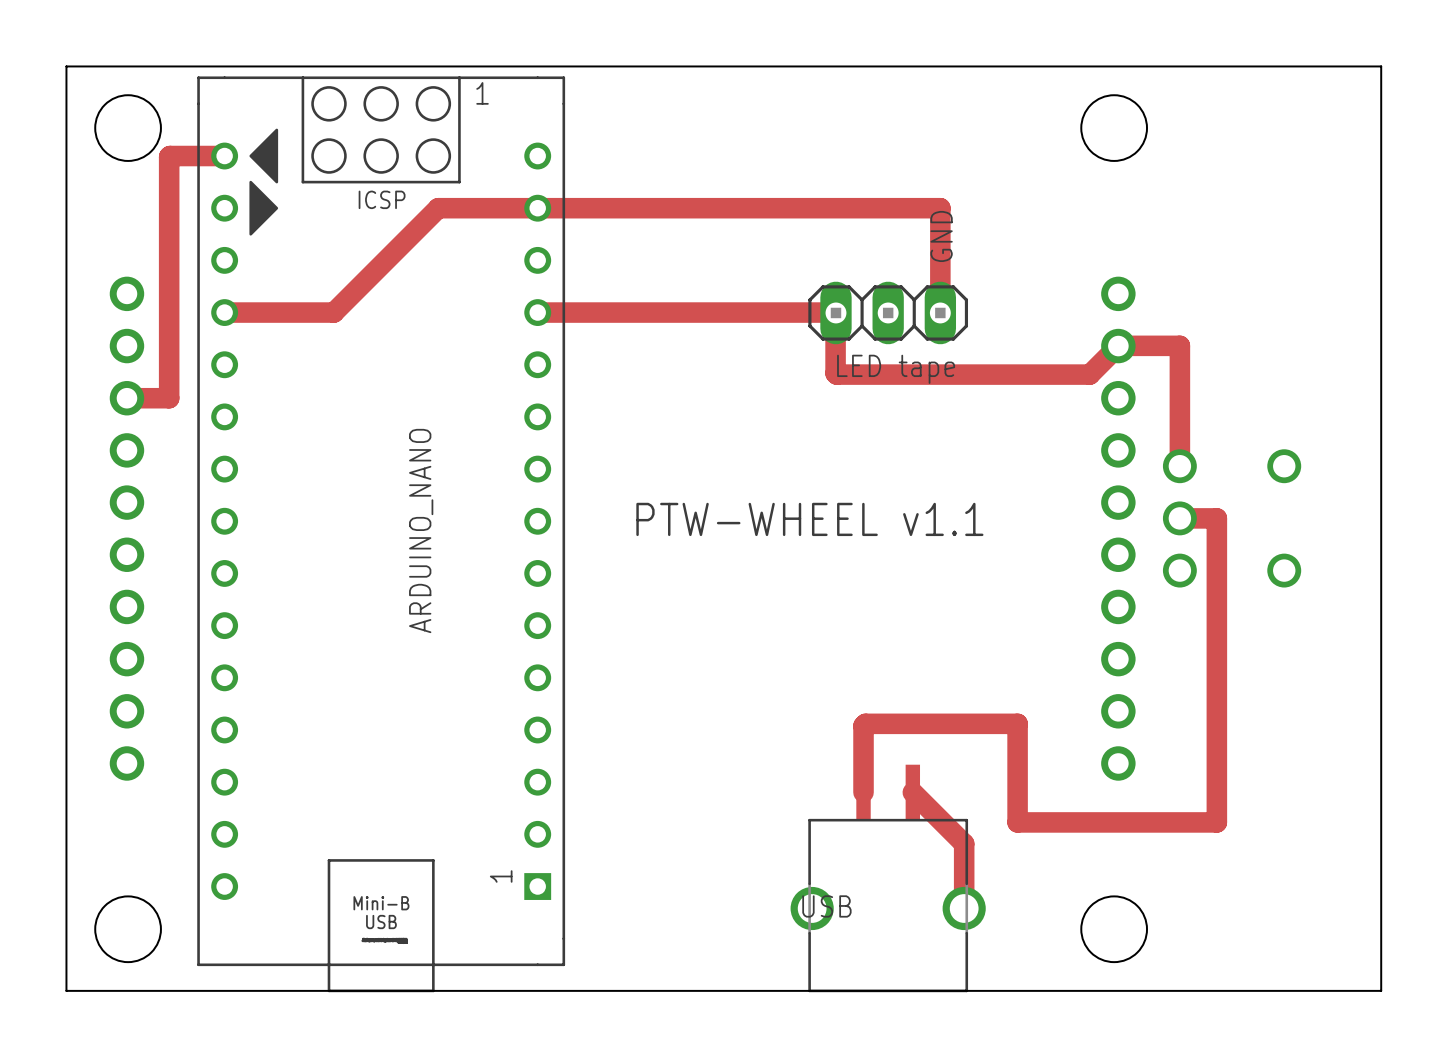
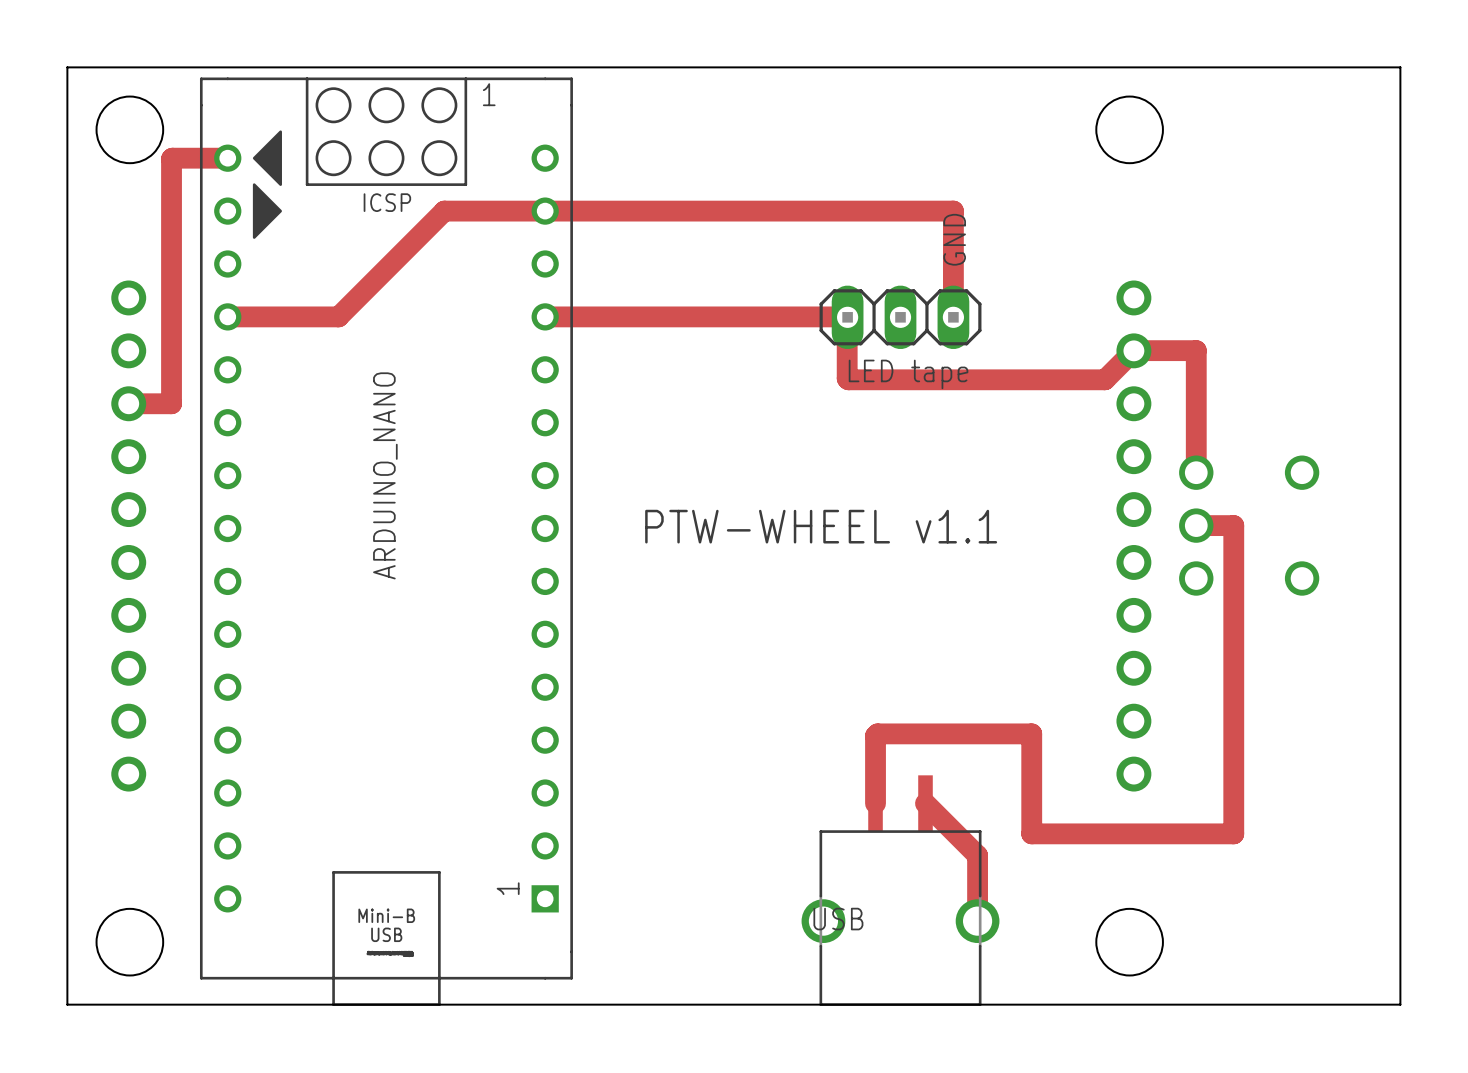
ARDUINO_NANO name position: ARDUINO_NANO (421, 530) -> ARDUINO_NANO (385, 475)

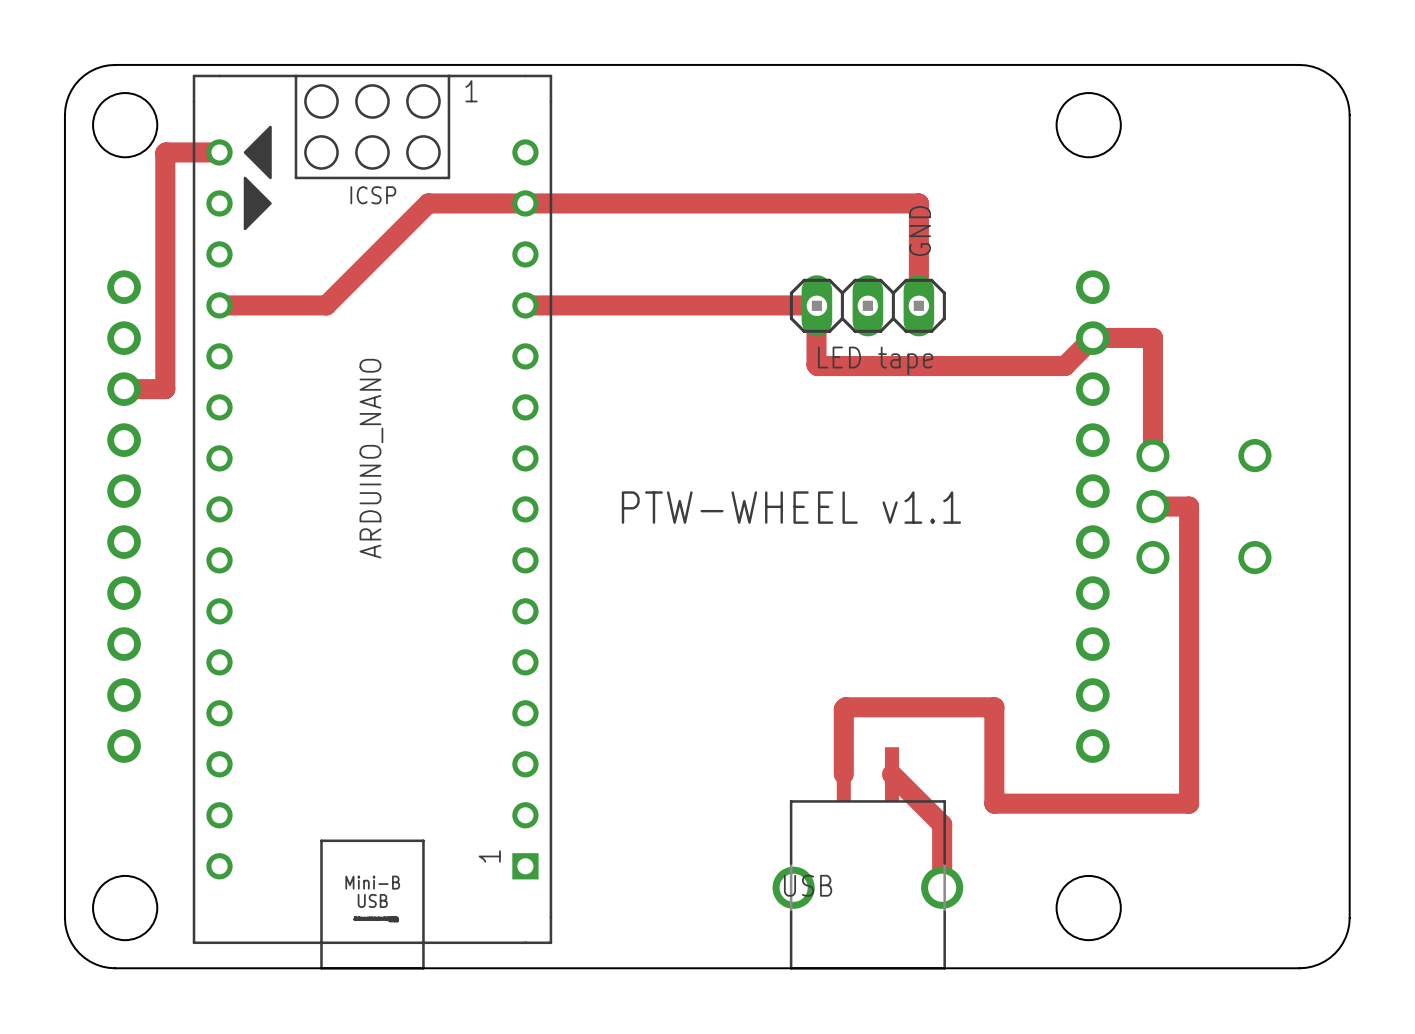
board edge: (119, 67) (67, 67) (67, 119) -> (115, 64) (95, 68) (79, 79) (68, 95) (64, 115)
board edge: (1348, 67) (1400, 67) (1400, 119) -> (1299, 64) (1318, 68) (1334, 79) (1345, 95) (1349, 115)
board edge: (67, 952) (67, 1004) (119, 1004) -> (64, 918) (68, 937) (79, 953) (95, 964) (115, 968)
board edge: (1400, 952) (1400, 1004) (1348, 1004) -> (1349, 918) (1345, 937) (1334, 953) (1318, 964) (1299, 968)

